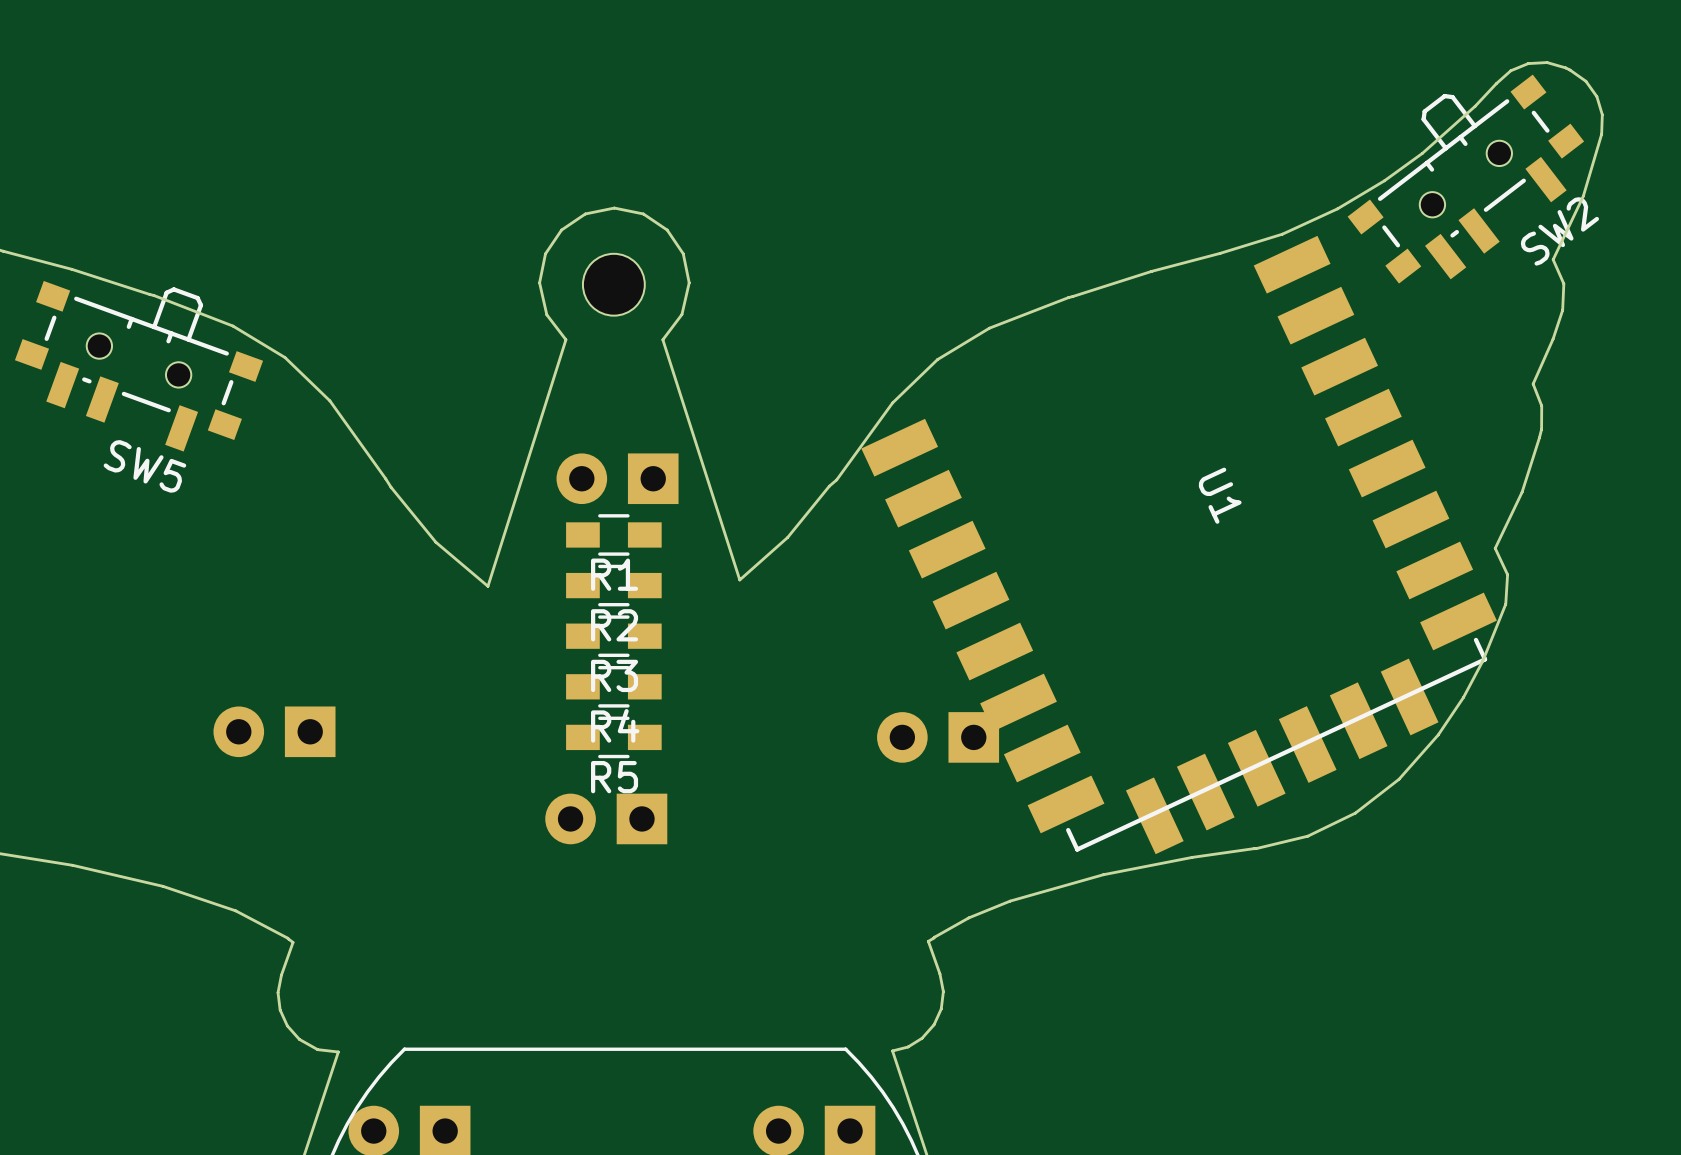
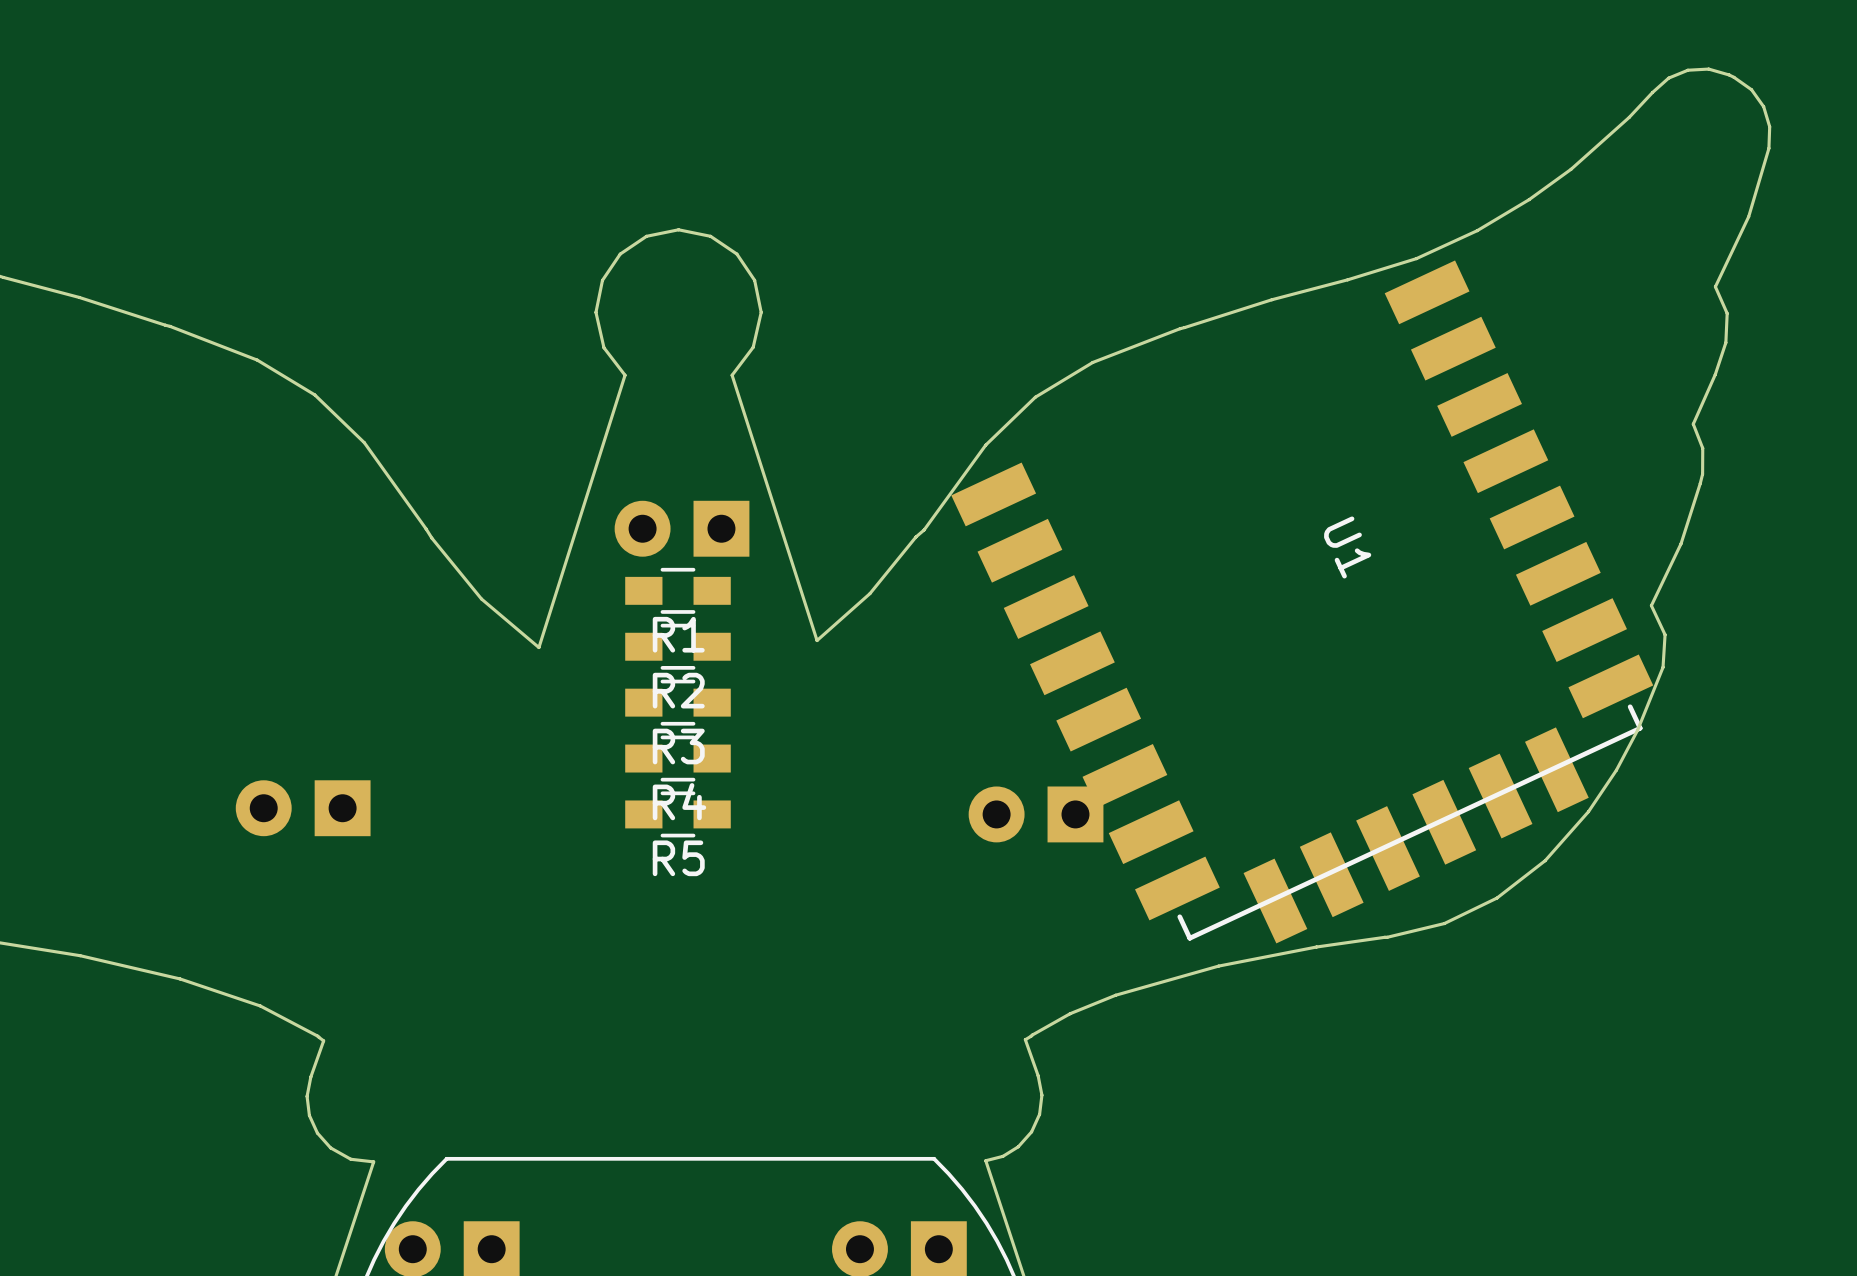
SW2: (1465, 179) -> none
part: (613, 284) -> none
SW5: (139, 366) -> none
part: (606, 818) -> none

